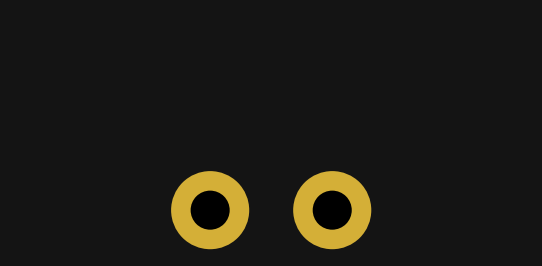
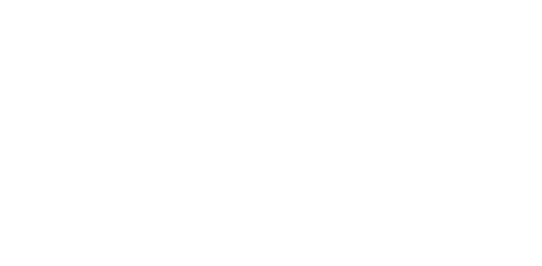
part: (271, 210) -> none

